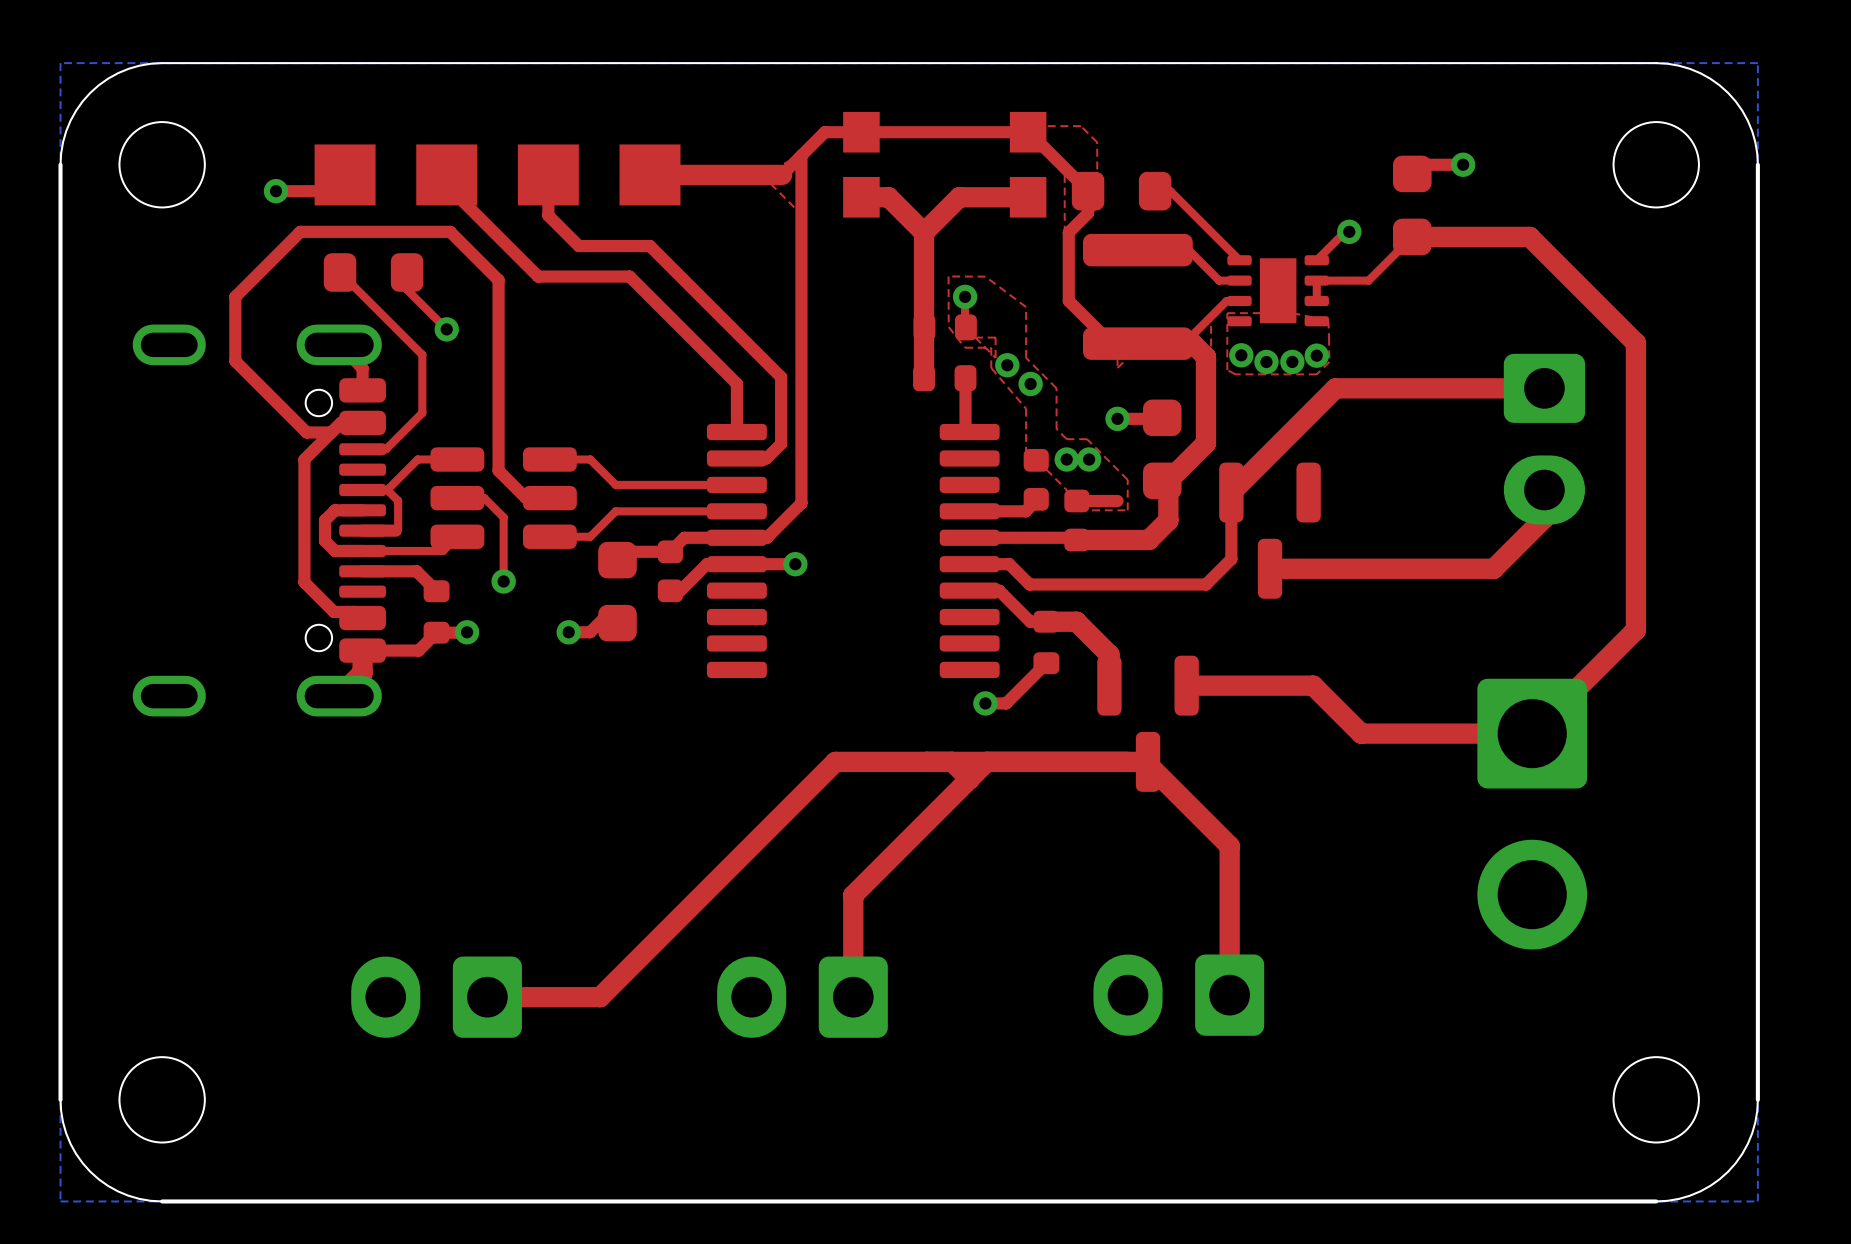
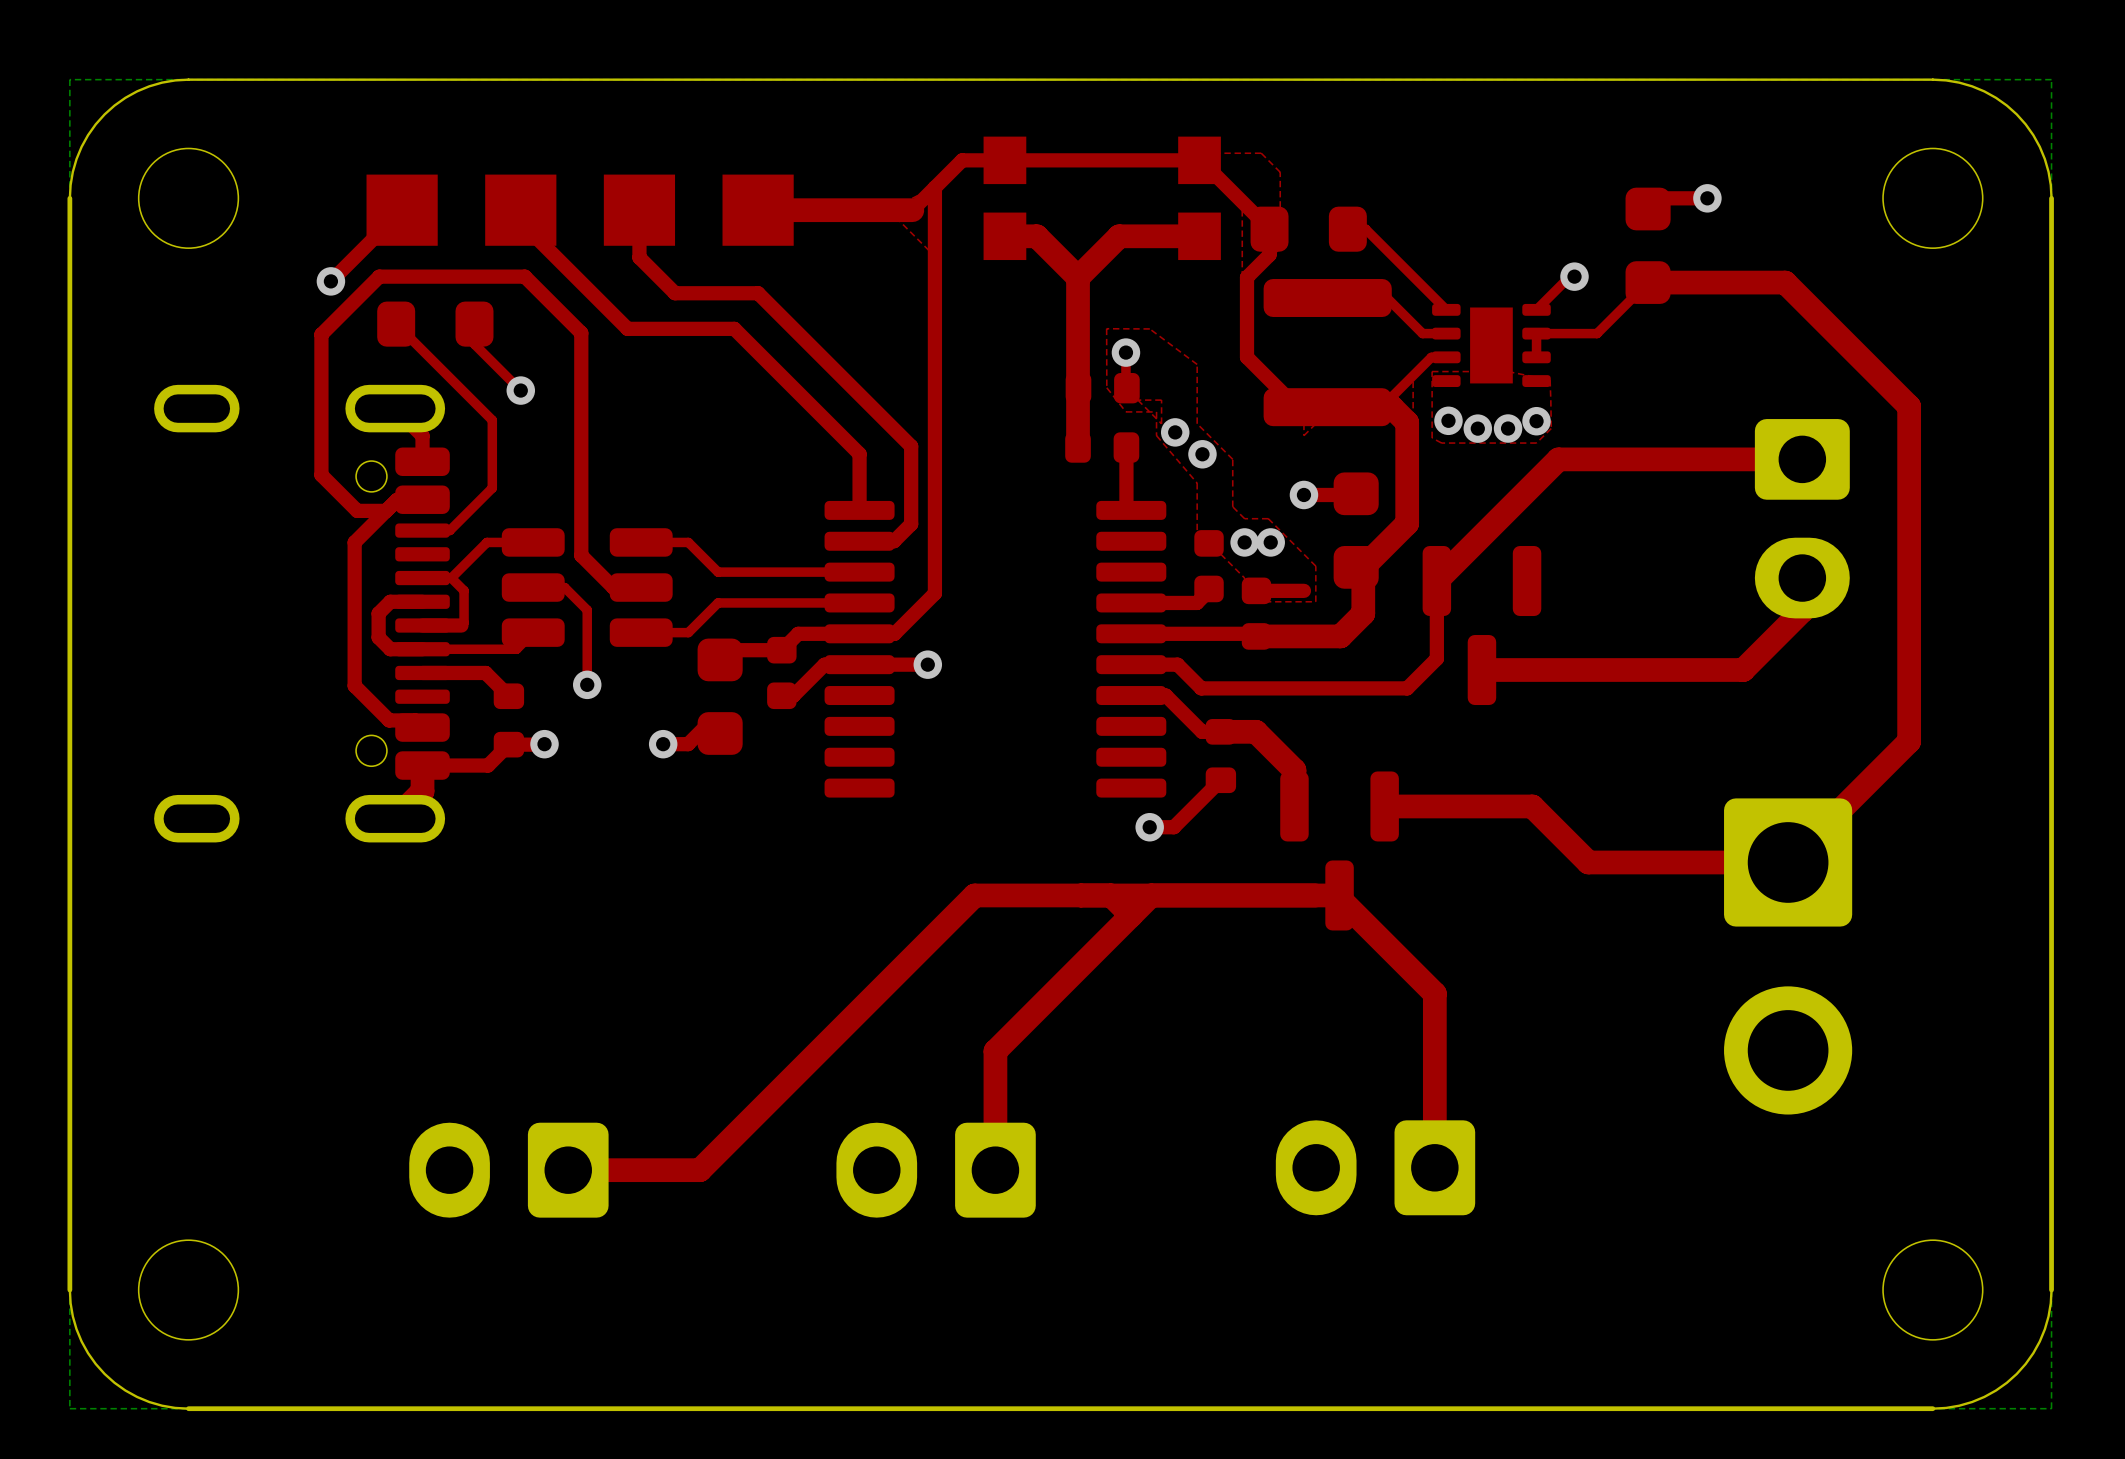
via position: (275, 191) -> (330, 281)
top track: (328, 191) (275, 191) -> (383, 229) (330, 281)
top track: (325, 231) (300, 231) (235, 296) (235, 361) (275, 401) -> (379, 276) (321, 334) (321, 475)

